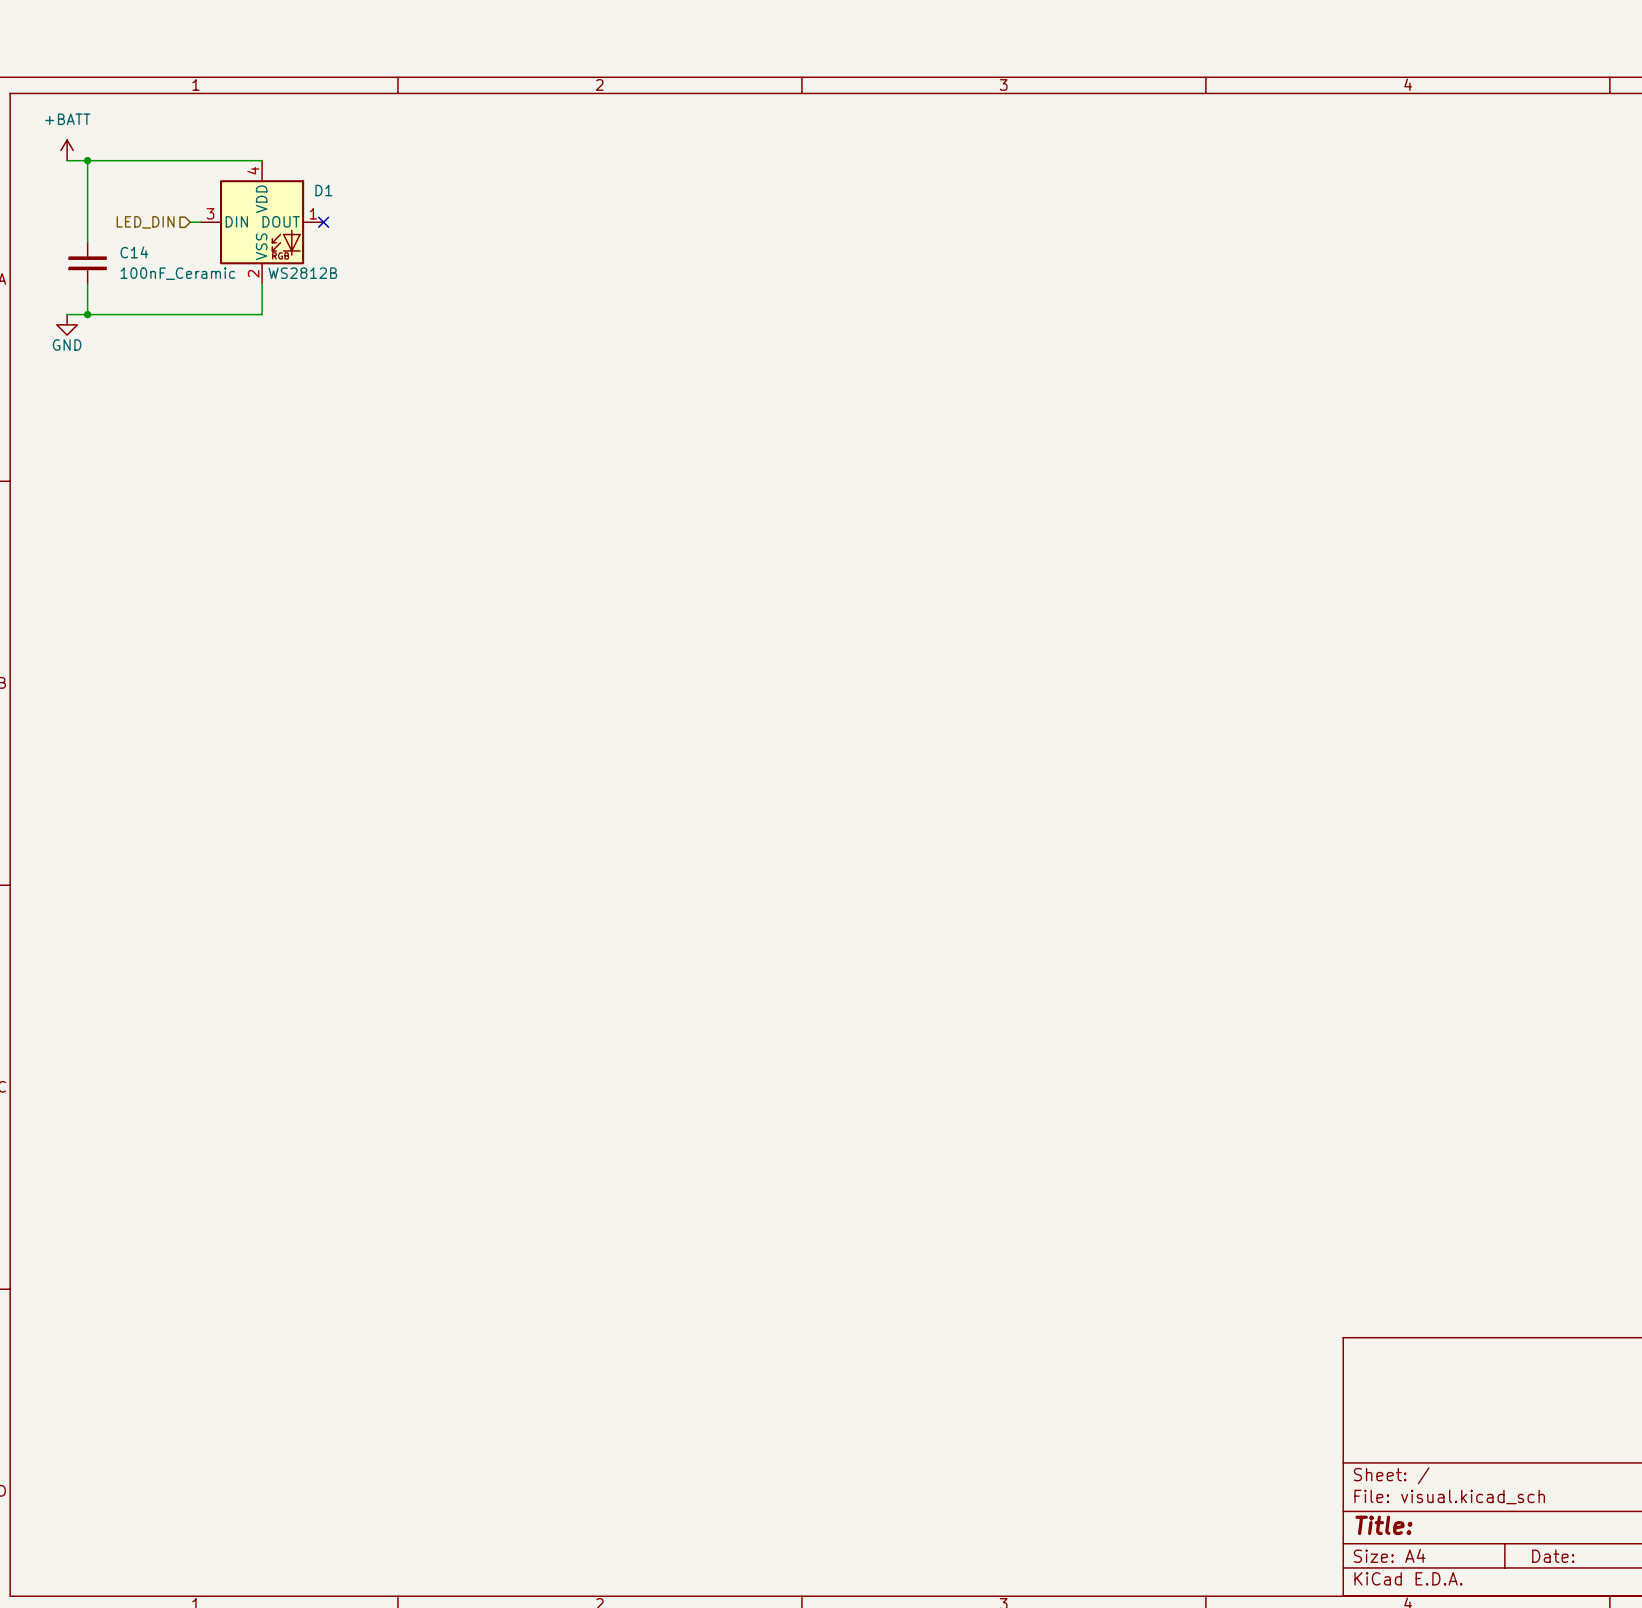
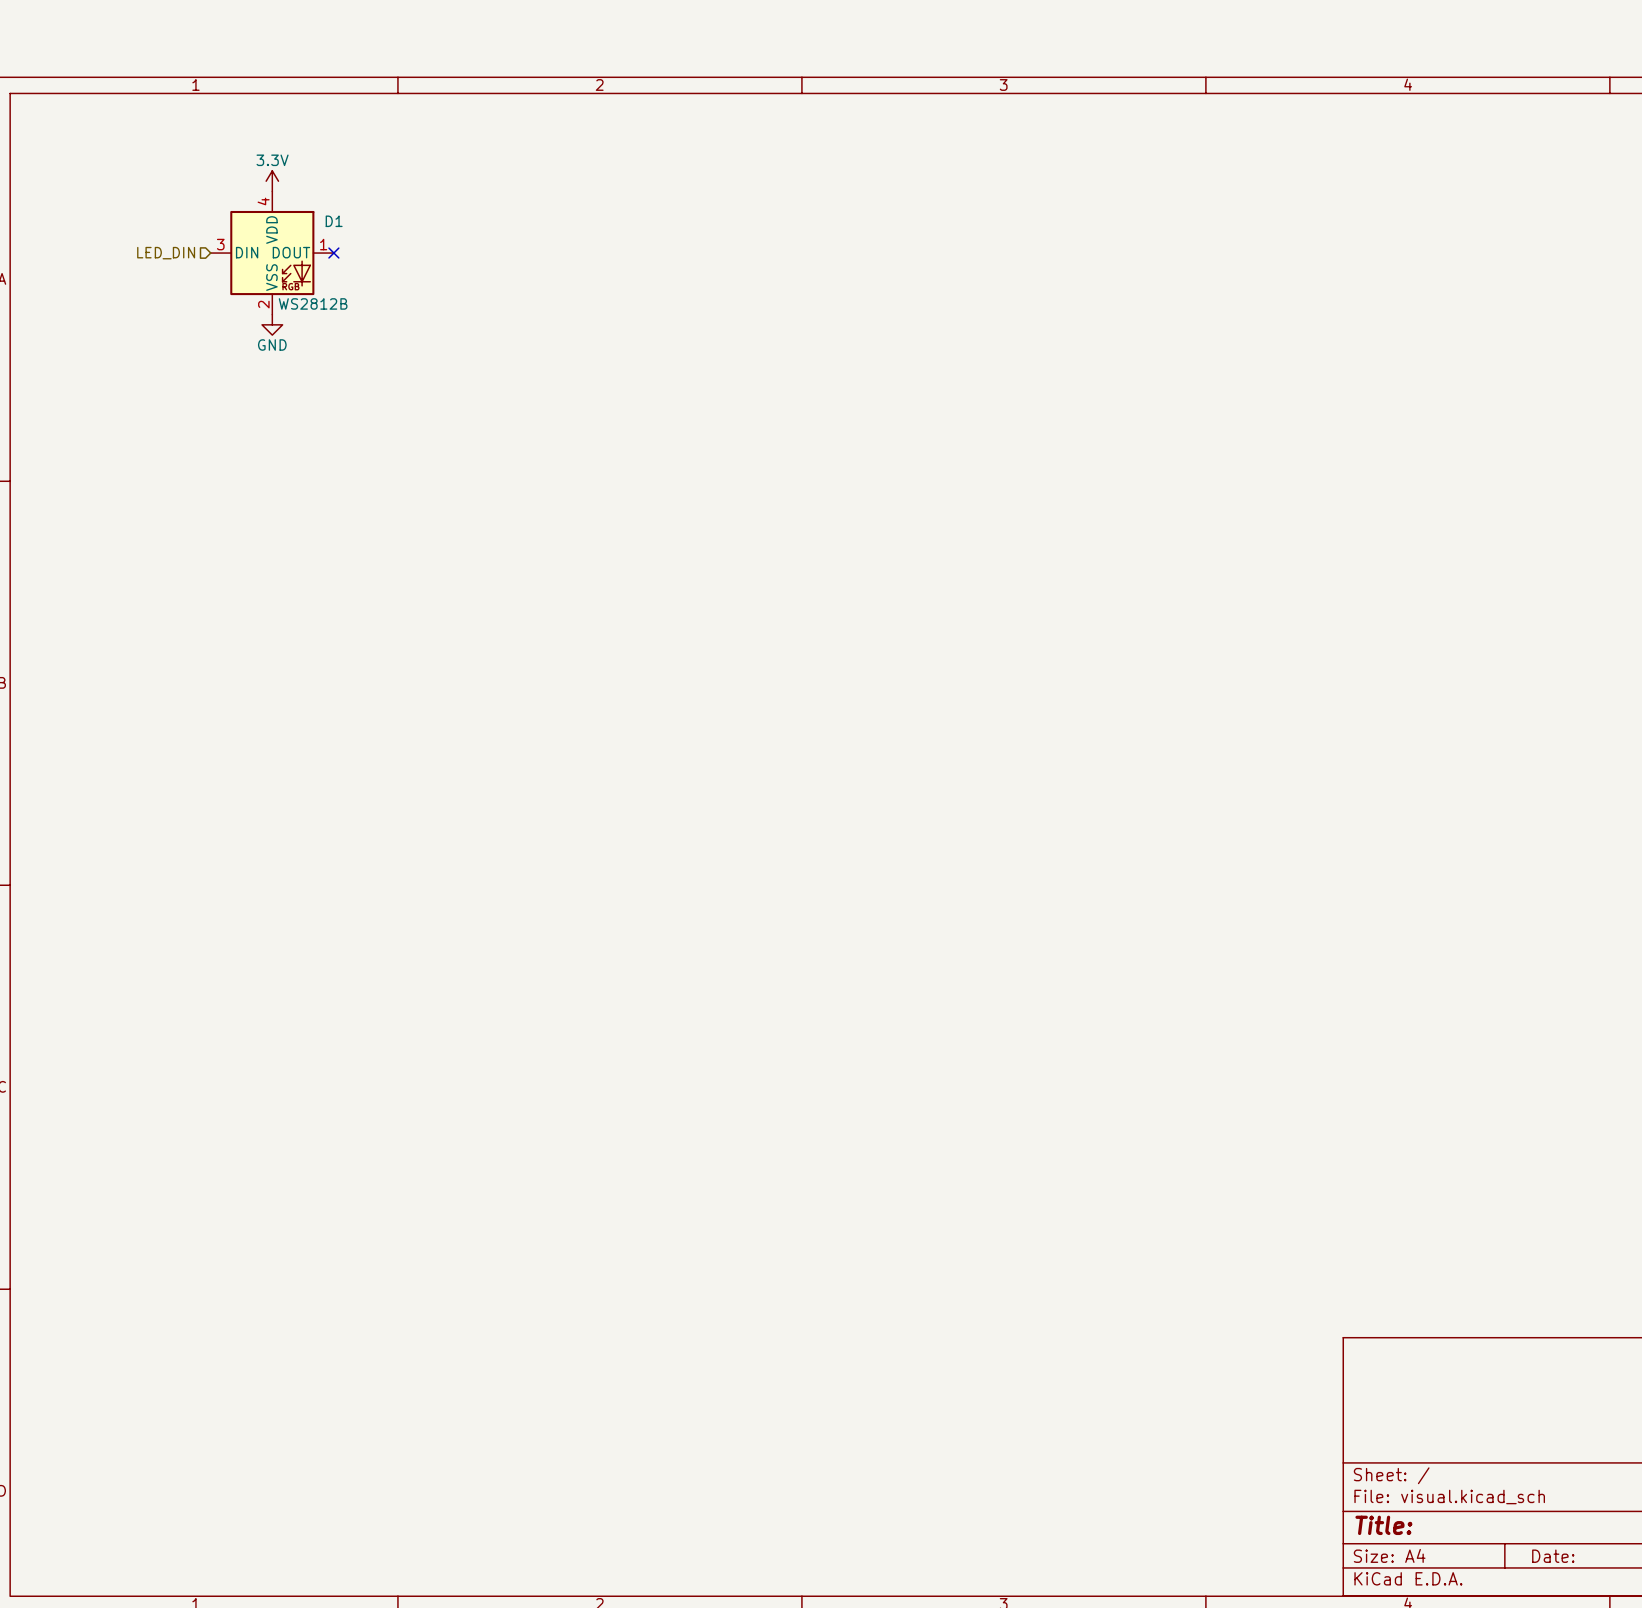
power symbol: +BATT (67, 150) -> none
wire: (67, 160) (262, 160) -> none
wire: (87, 160) (87, 242) -> none
junction: (87, 160) -> none
power symbol: none -> 3.3V (272, 181)
hierarchical label position: LED_DIN (145, 222) -> LED_DIN (166, 253)
wire: (190, 222) (200, 222) -> none
D1 position: (262, 222) -> (272, 253)
no-connect mark position: (323, 222) -> (333, 253)
C14: 100nF_Ceramic (87, 263) -> none
wire: (87, 283) (87, 314) -> none
wire: (262, 283) (262, 314) (67, 314) -> none
junction: (87, 314) -> none
power symbol: GND (67, 324) -> none
power symbol: none -> GND (272, 324)

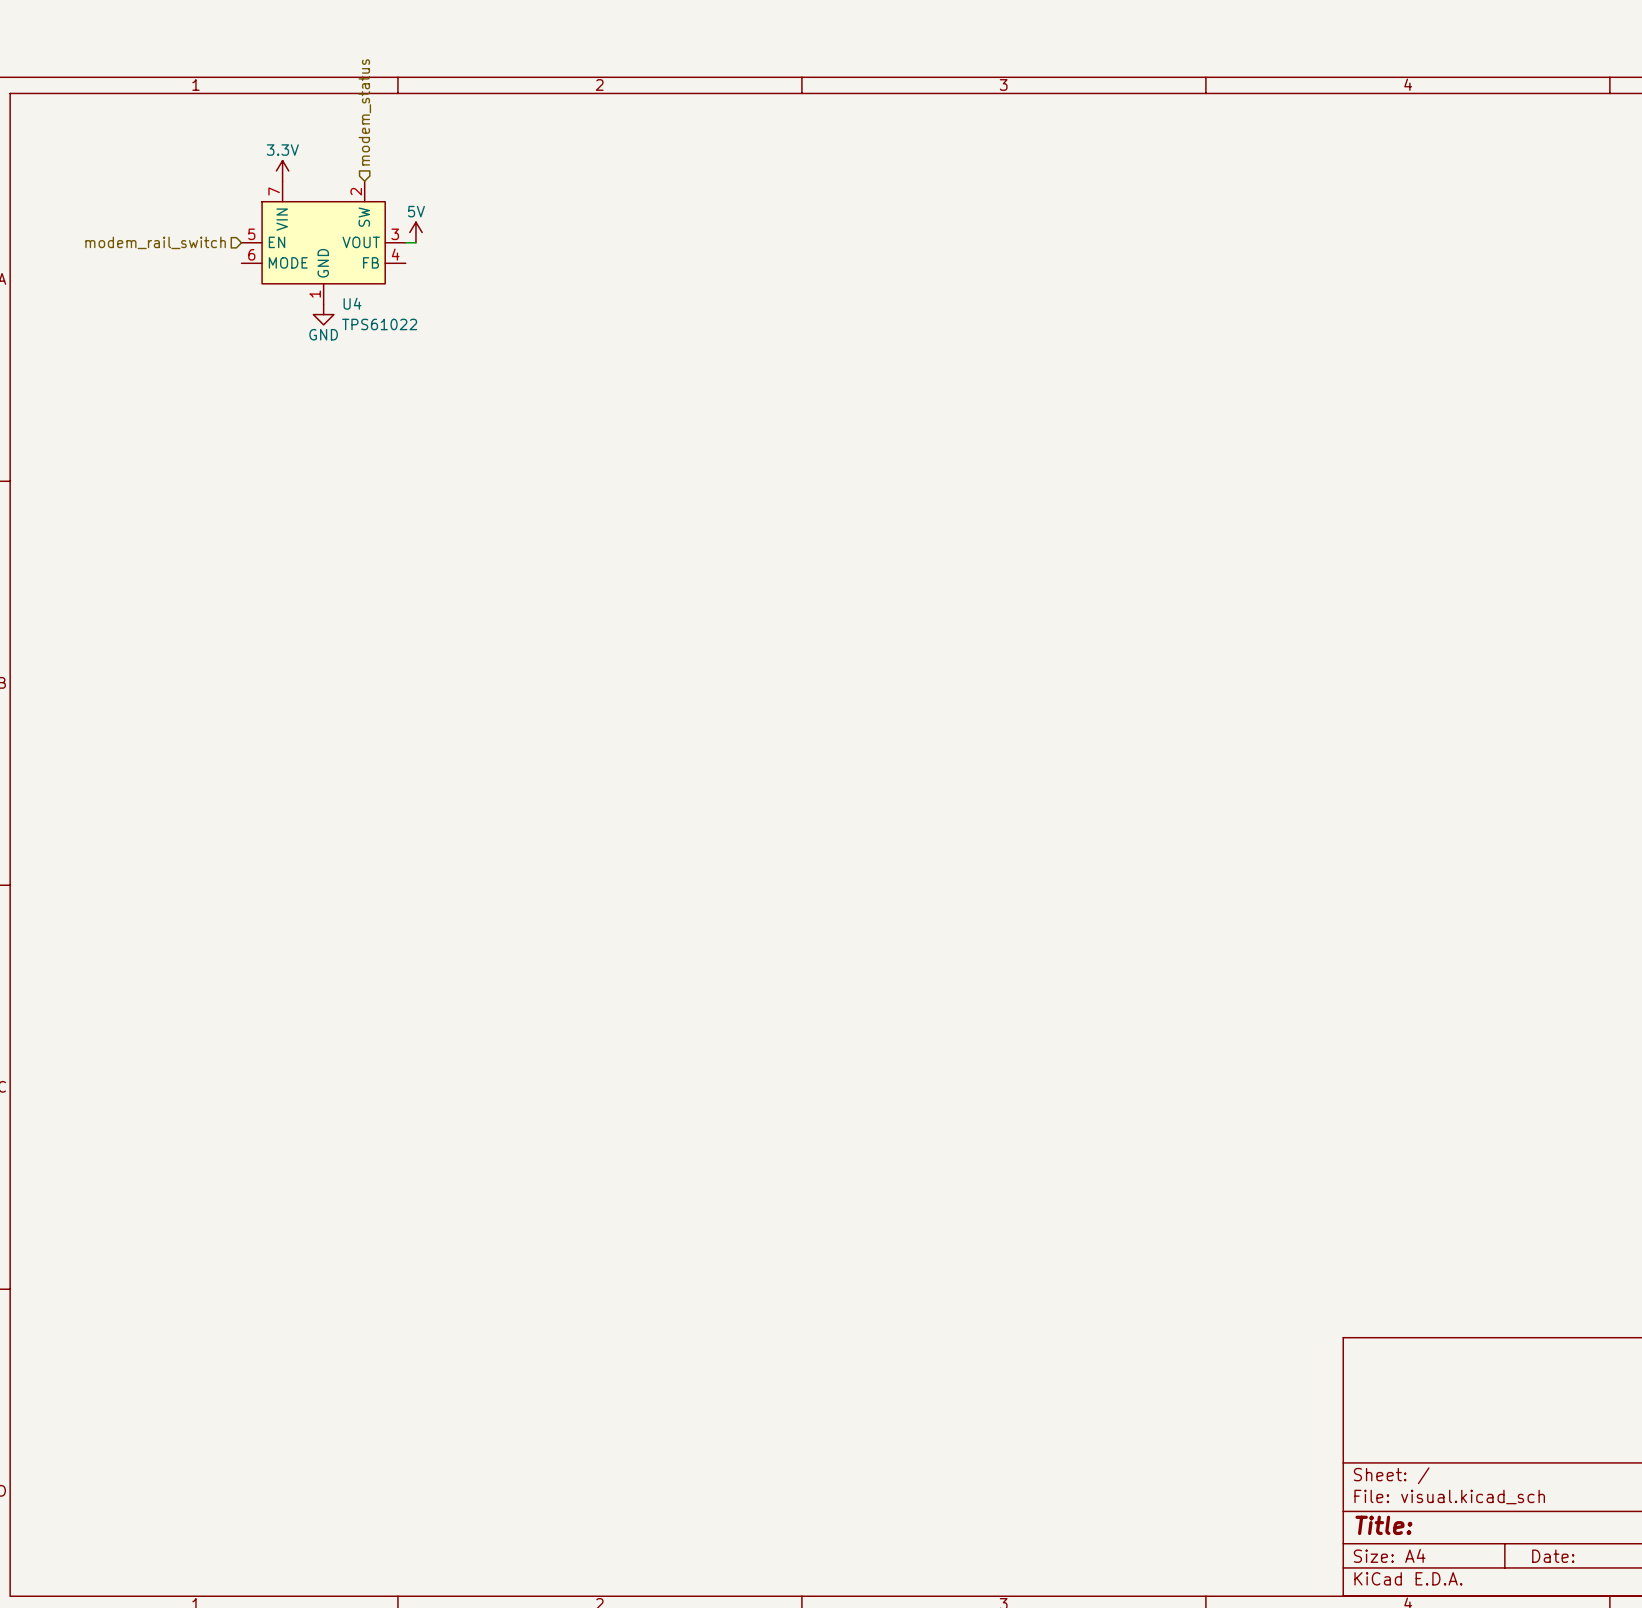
hierarchical label: none -> modem_status (364, 112)
power symbol position: 3.3V (272, 181) -> 3.3V (282, 170)
power symbol: none -> 5V (415, 232)
hierarchical label: none -> modem_rail_switch (155, 242)
U4: none -> TPS61022 (323, 242)
wire: none -> (405, 242) (415, 242)
hierarchical label: LED_DIN (166, 253) -> none
D1: WS2812B (272, 253) -> none
no-connect mark: (333, 253) -> none
power symbol position: GND (272, 324) -> GND (323, 314)

